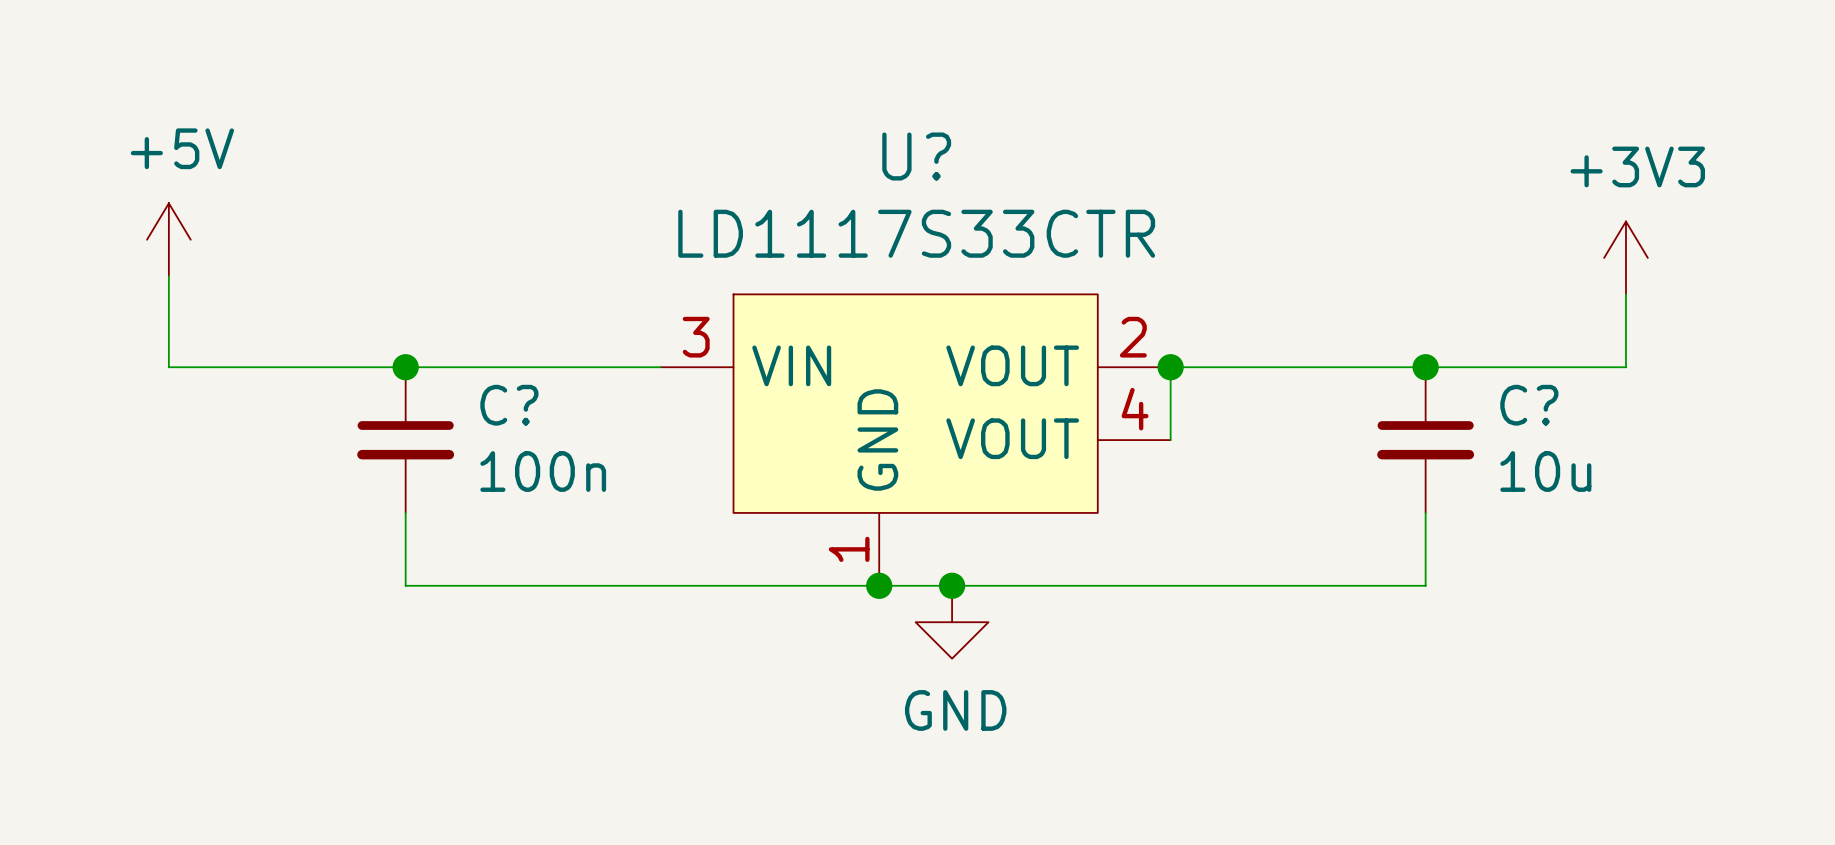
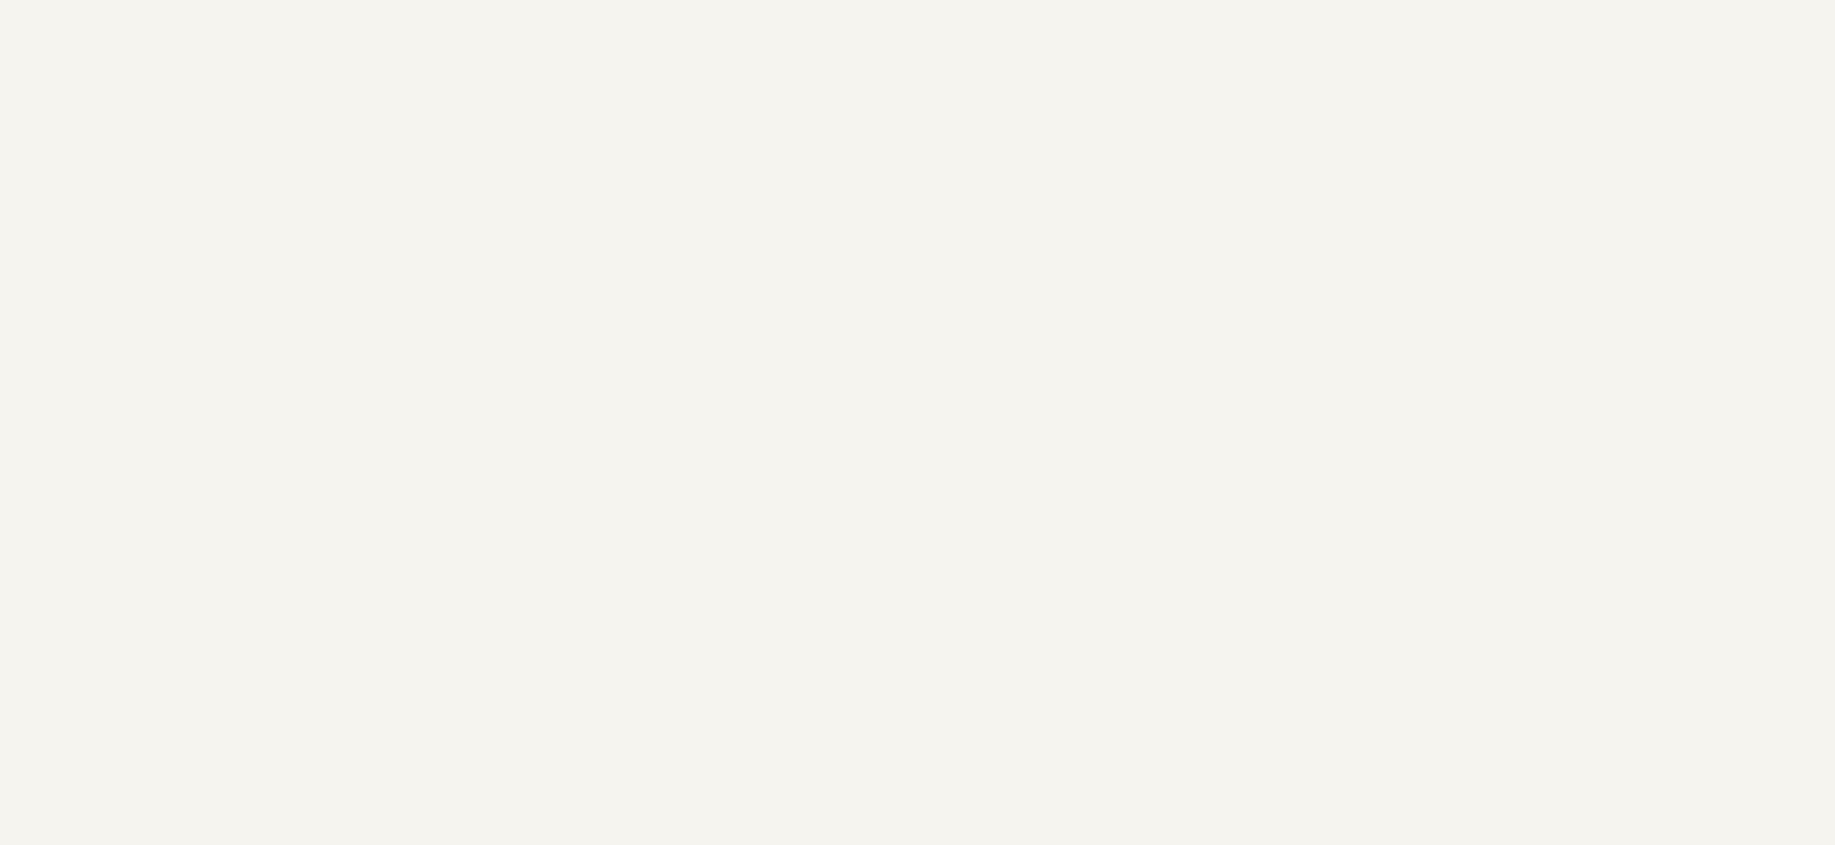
power symbol: +5V (168, 239) -> none
power symbol: +3V3 (1625, 257) -> none
wire: (168, 276) (168, 367) (660, 367) -> none
wire: (1625, 294) (1625, 367) (1170, 367) (1170, 440) -> none
junction: (405, 367) -> none
junction: (1170, 367) -> none
junction: (1425, 367) -> none
C?: 100n (405, 440) -> none
U?: LD1117S33CTR (915, 440) -> none
C?: 10u (1425, 440) -> none
wire: (405, 512) (405, 585) (1425, 585) (1425, 512) -> none
junction: (879, 585) -> none
junction: (952, 585) -> none
power symbol: GND (952, 622) -> none

